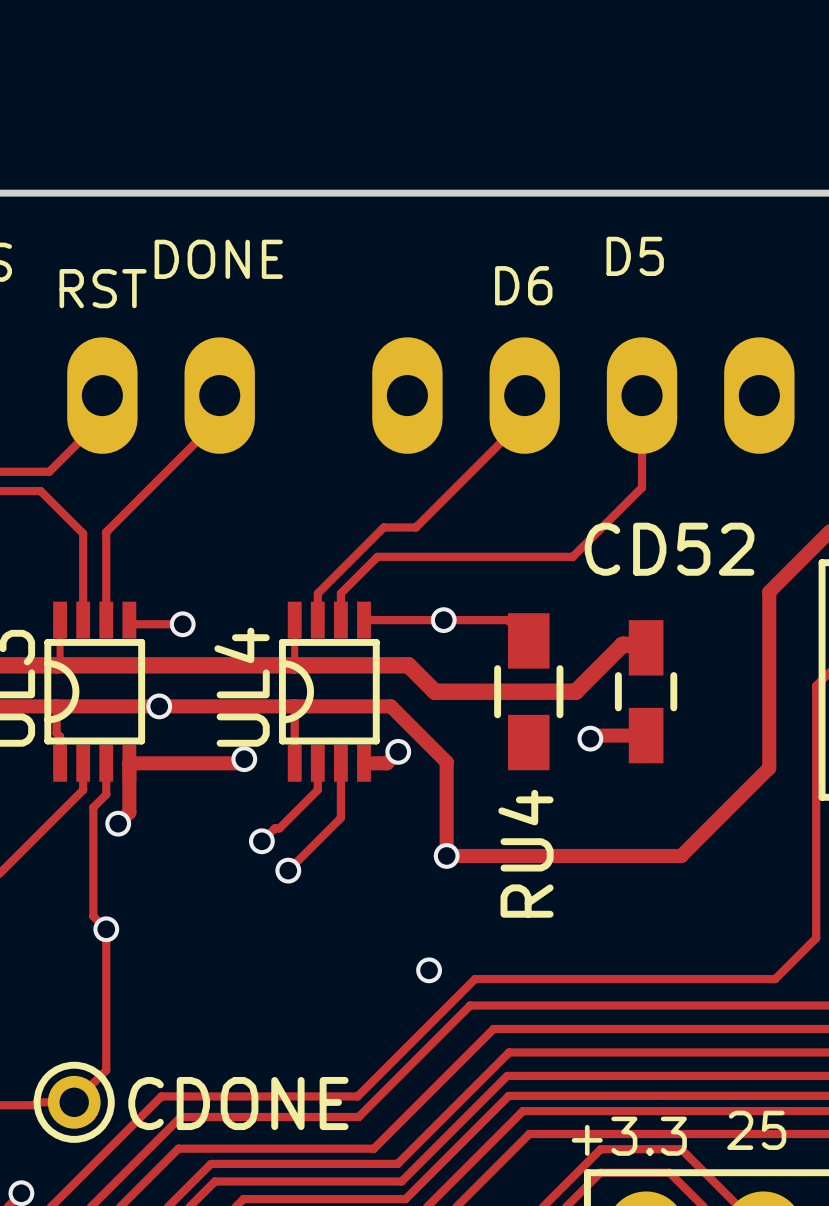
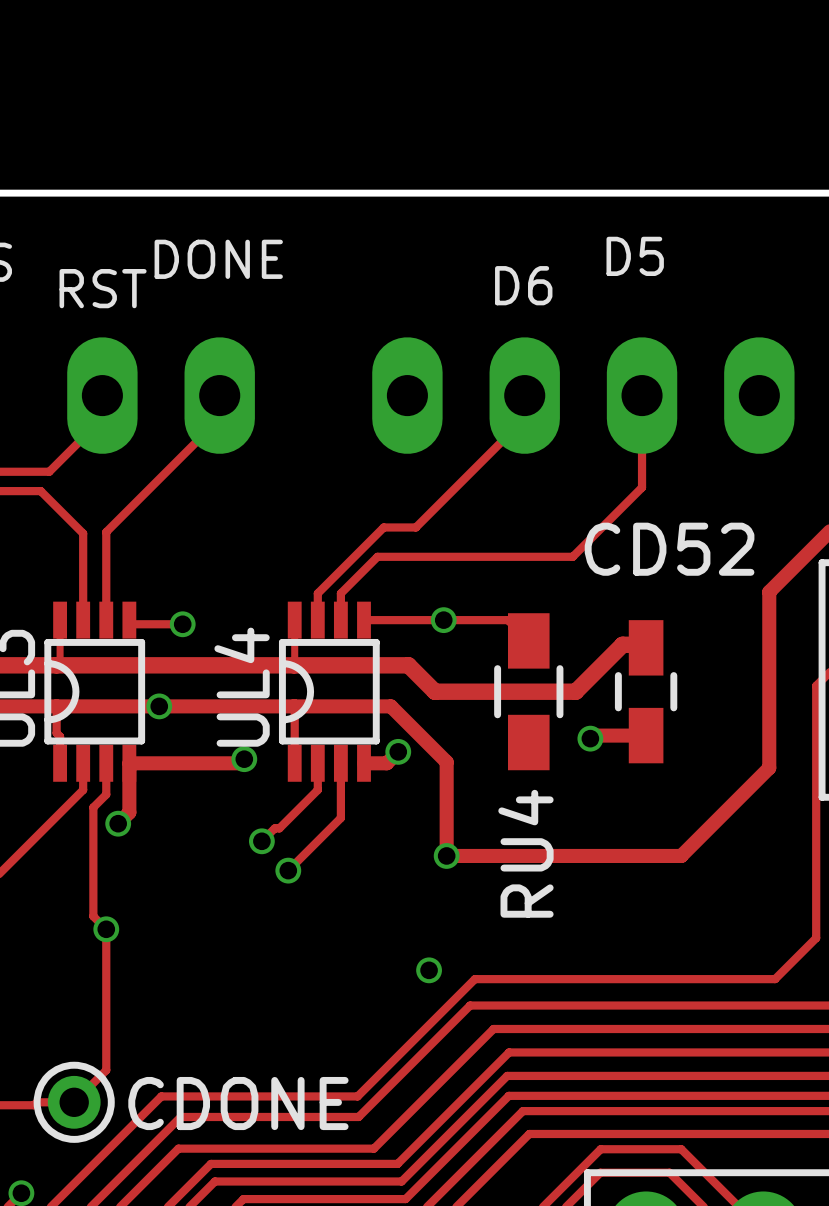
text: 25 (756, 1130) -> none
text: +3.3 (629, 1136) -> none

